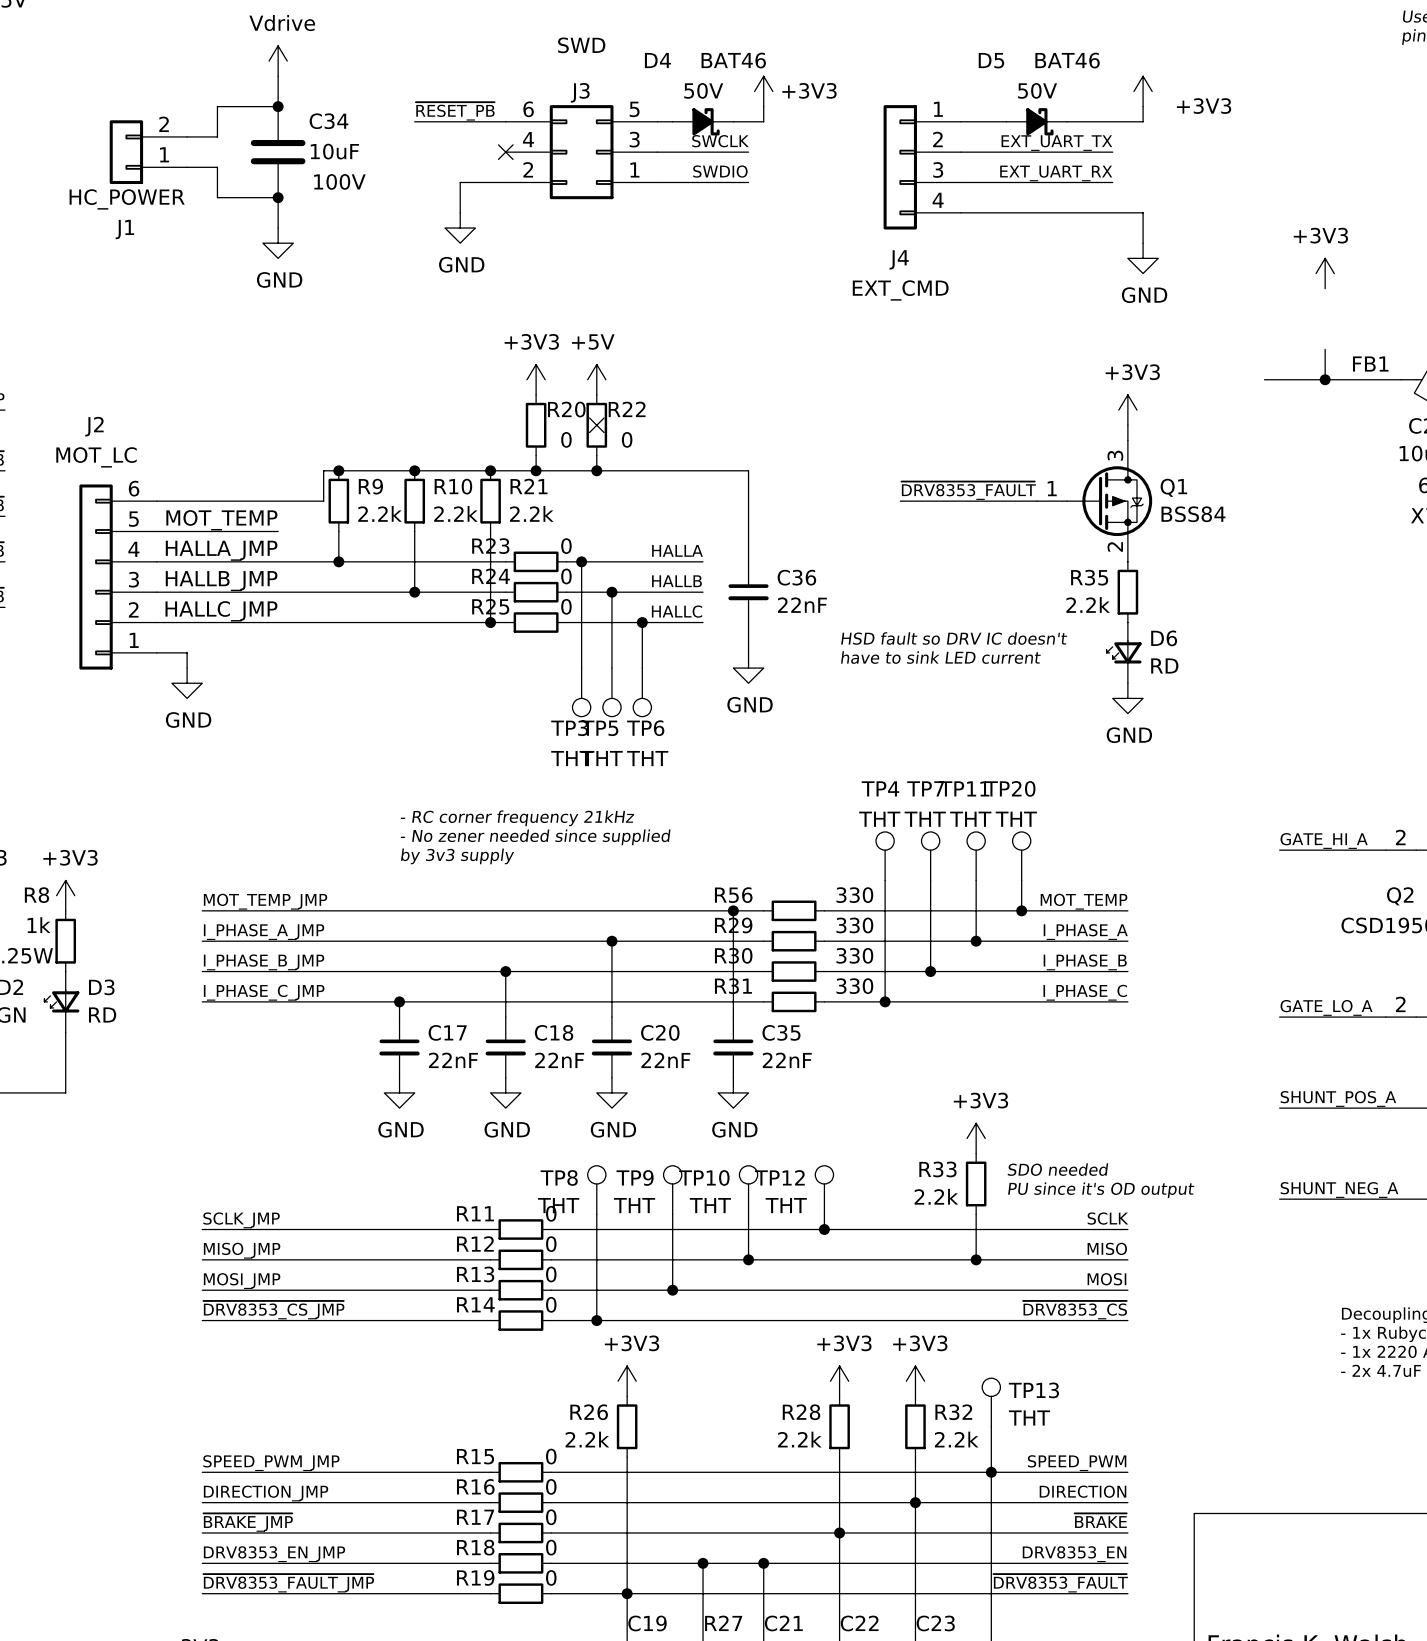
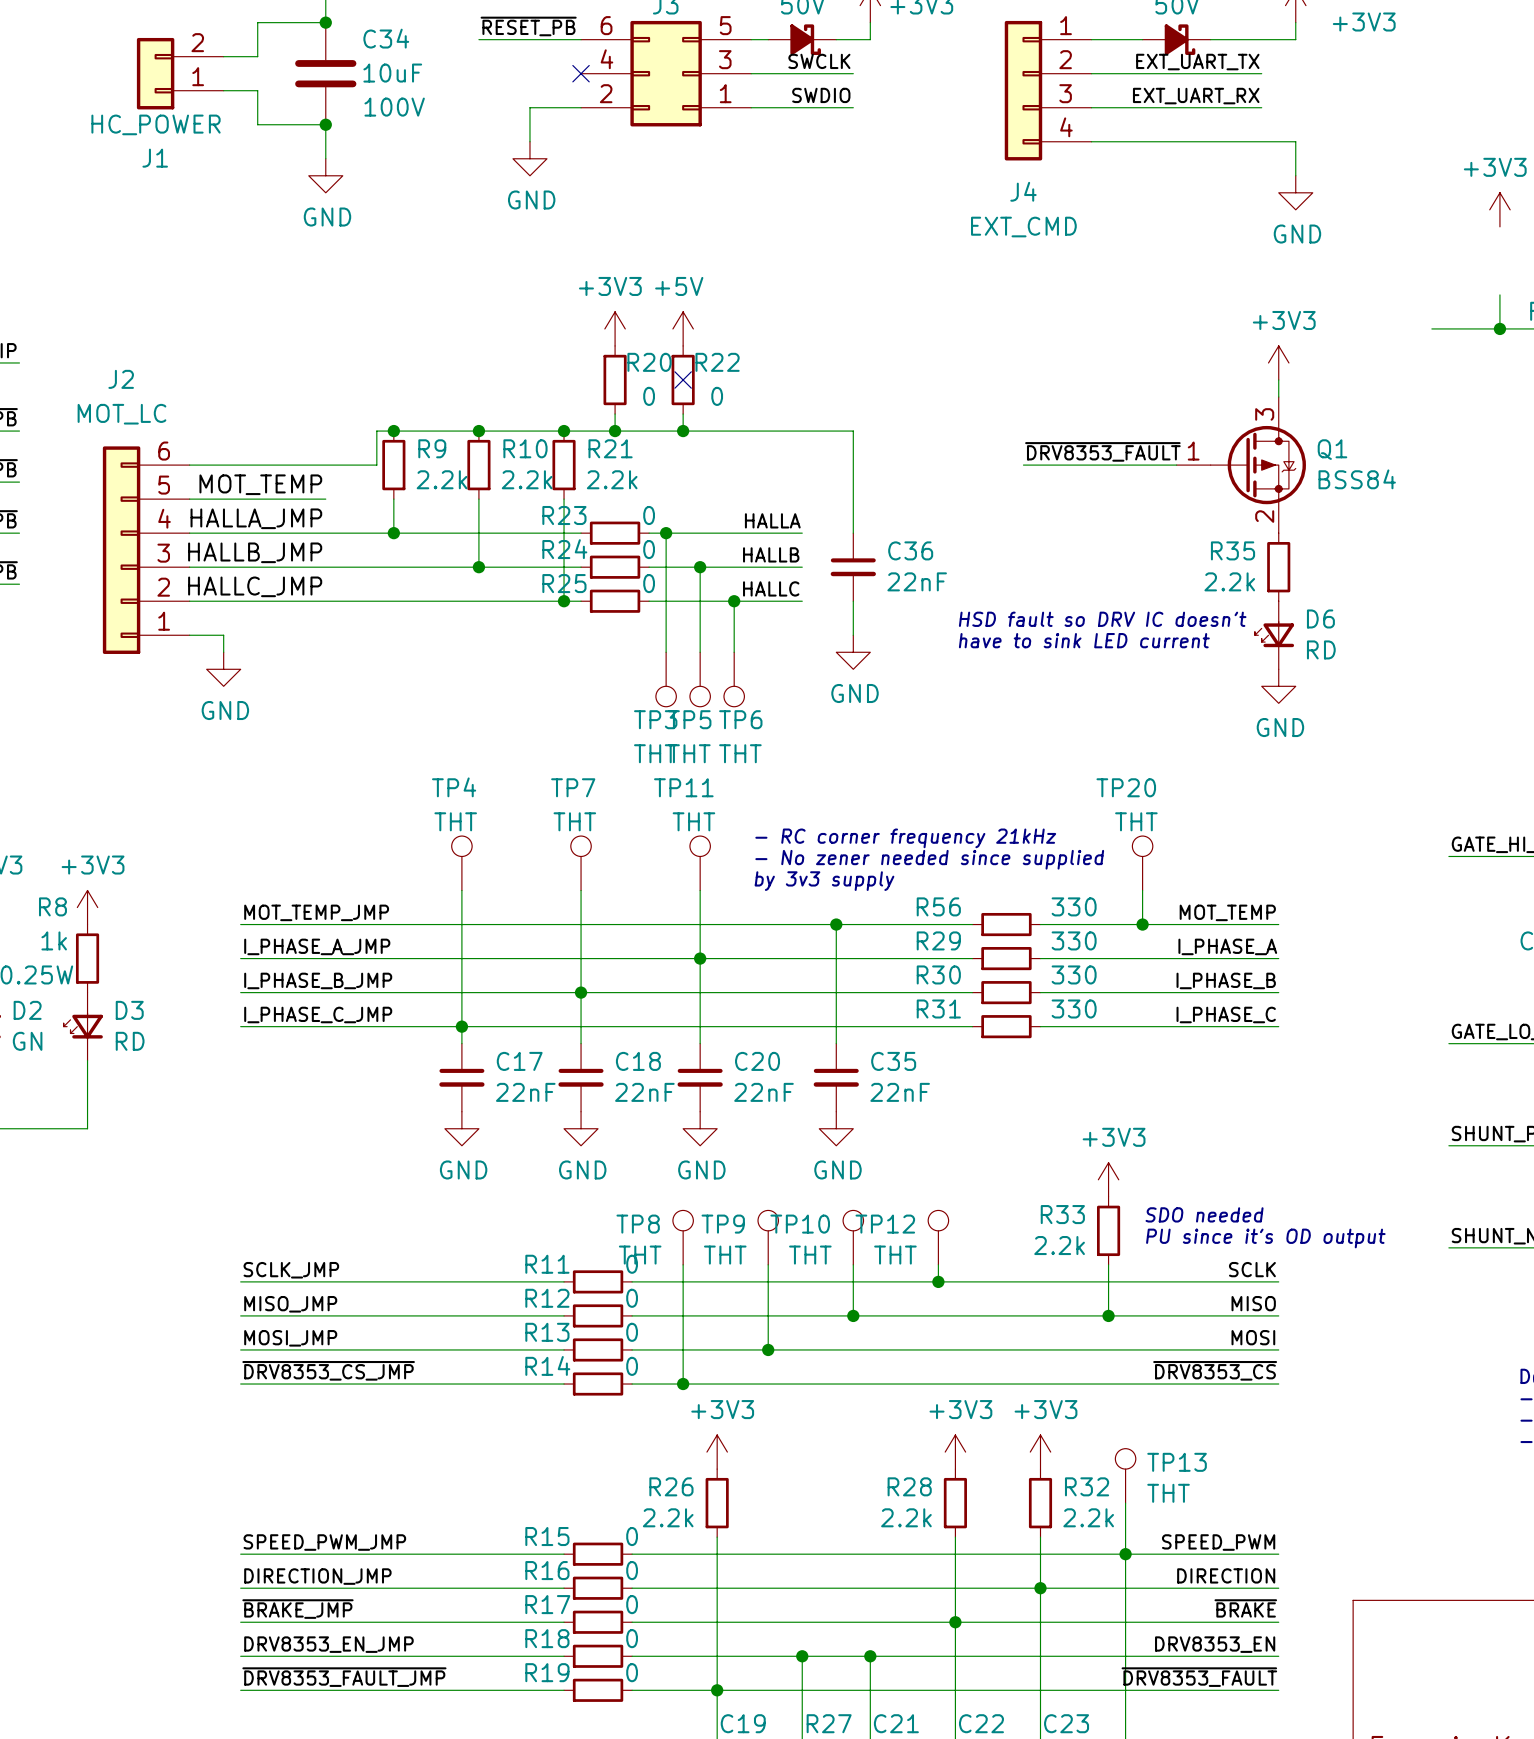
text position: - RC corner frequency 21kHz (517, 818) -> - RC corner frequency 21kHz (905, 838)
text position: - No zener needed since supplied (535, 837) -> - No zener needed since supplied (929, 859)
text position: by 3v3 supply (457, 856) -> by 3v3 supply (824, 881)
TP4 position: (885, 856) -> (461, 863)
TP7 position: (930, 856) -> (581, 863)
TP11 position: (976, 856) -> (700, 863)
TP20 position: (1021, 856) -> (1142, 863)
wire: none -> (461, 890) (461, 1026)
wire: none -> (581, 890) (581, 992)
wire: none -> (700, 890) (700, 958)
wire: (885, 880) (885, 1001) -> none
wire: (930, 880) (930, 971) -> none
wire: (976, 880) (976, 941) -> none
wire: (1021, 880) (1021, 910) -> (1142, 890) (1142, 924)
R56 position: (794, 910) -> (1006, 924)
wire: (854, 910) (915, 910) -> (870, 924) (938, 924)
junction position: (1021, 910) -> (1142, 924)
R29 position: (794, 941) -> (1006, 958)
wire: (854, 941) (915, 941) -> (870, 958) (938, 958)
junction: (976, 941) -> none
R30 position: (794, 971) -> (1006, 992)
wire: (854, 971) (915, 971) -> (870, 992) (938, 992)
junction: (930, 971) -> none
R31 position: (794, 1001) -> (1006, 1026)
wire: (854, 1001) (915, 1001) -> (870, 1026) (938, 1026)
junction: (885, 1001) -> none

